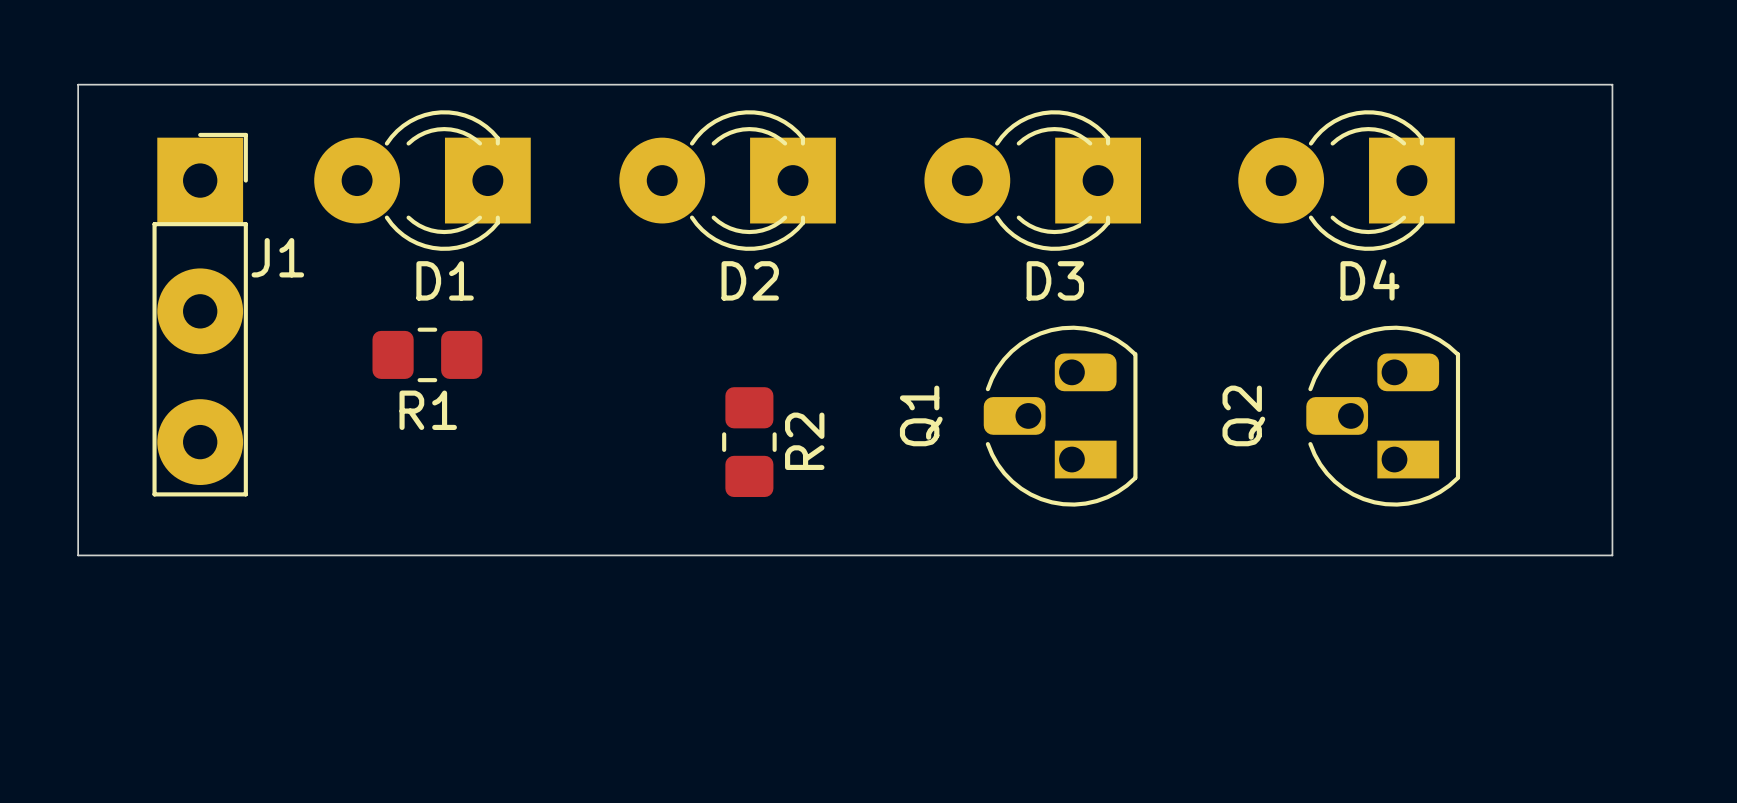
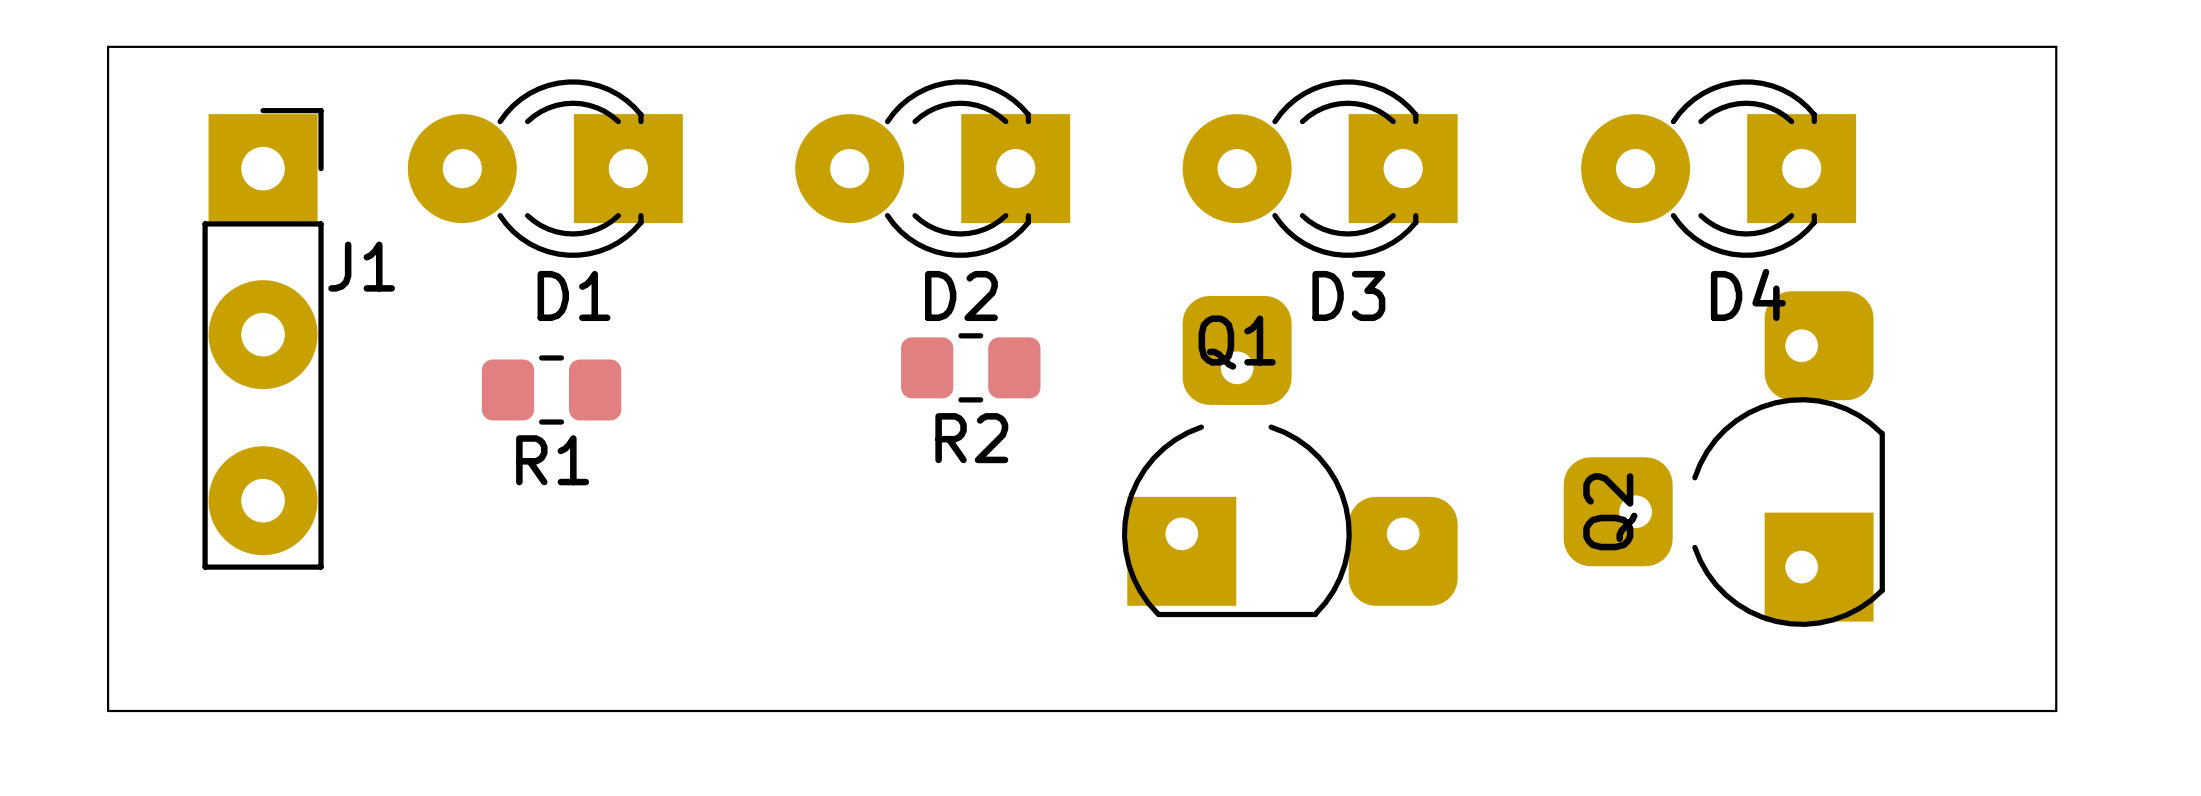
Q1 footprint: [983, 325, 1138, 507] -> [1121, 295, 1458, 618]
Q2 footprint: [1306, 325, 1461, 507] -> [1563, 291, 1885, 627]
Q1 name position: Q1 (921, 415) -> Q1 (1237, 342)
R2 rotation: 0° (749, 442) -> 90° clockwise (970, 367)
R2 position: (749, 442) -> (970, 367)
board edge: (78, 555) (1612, 555) -> (108, 644) (108, 711) (2056, 711) (2056, 644)

